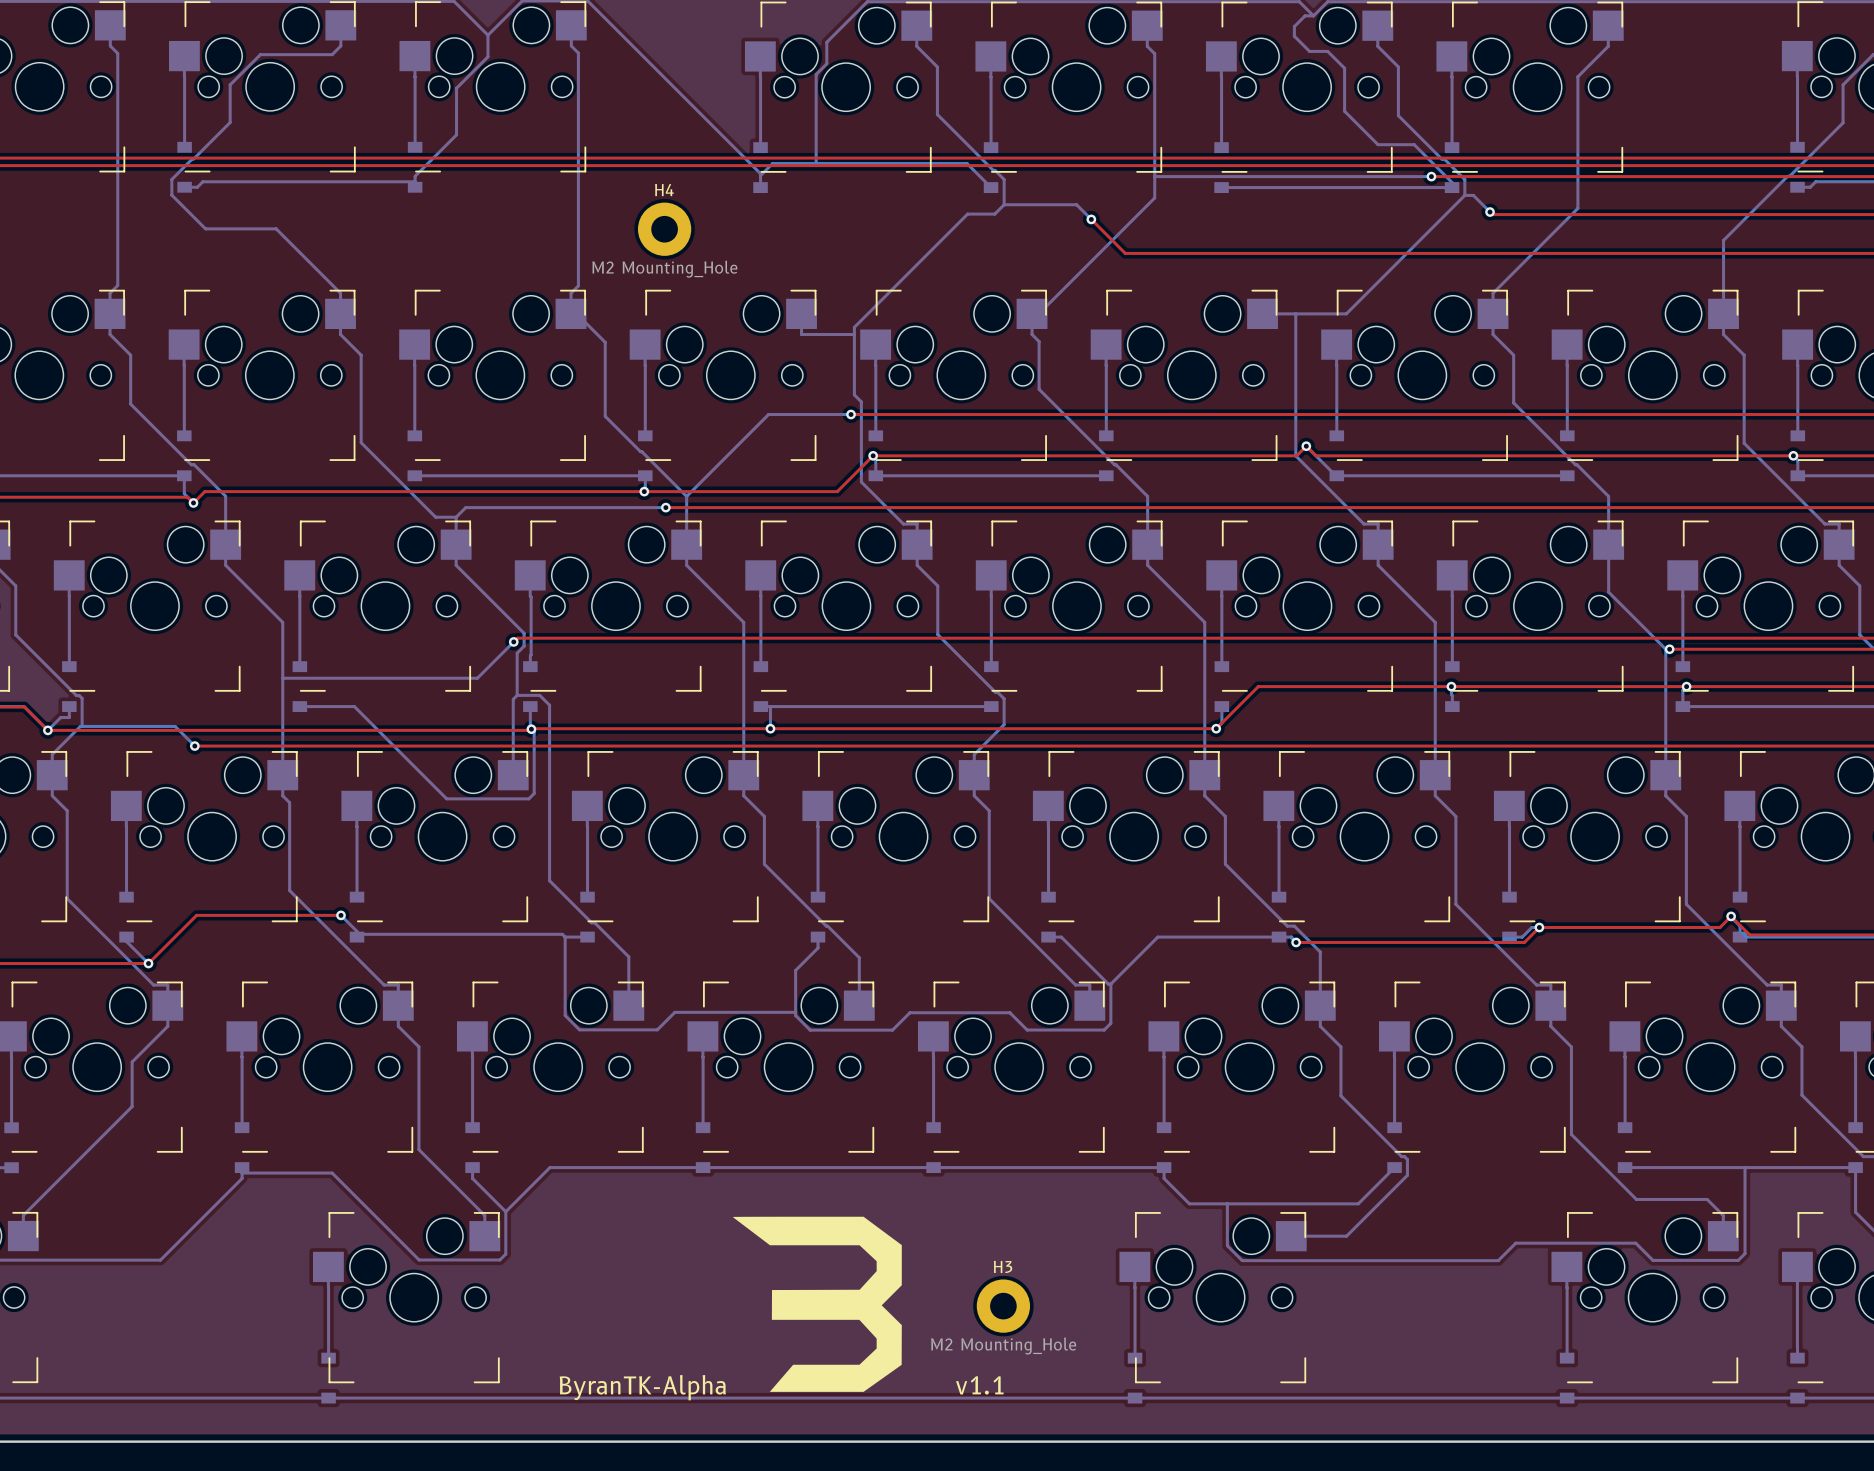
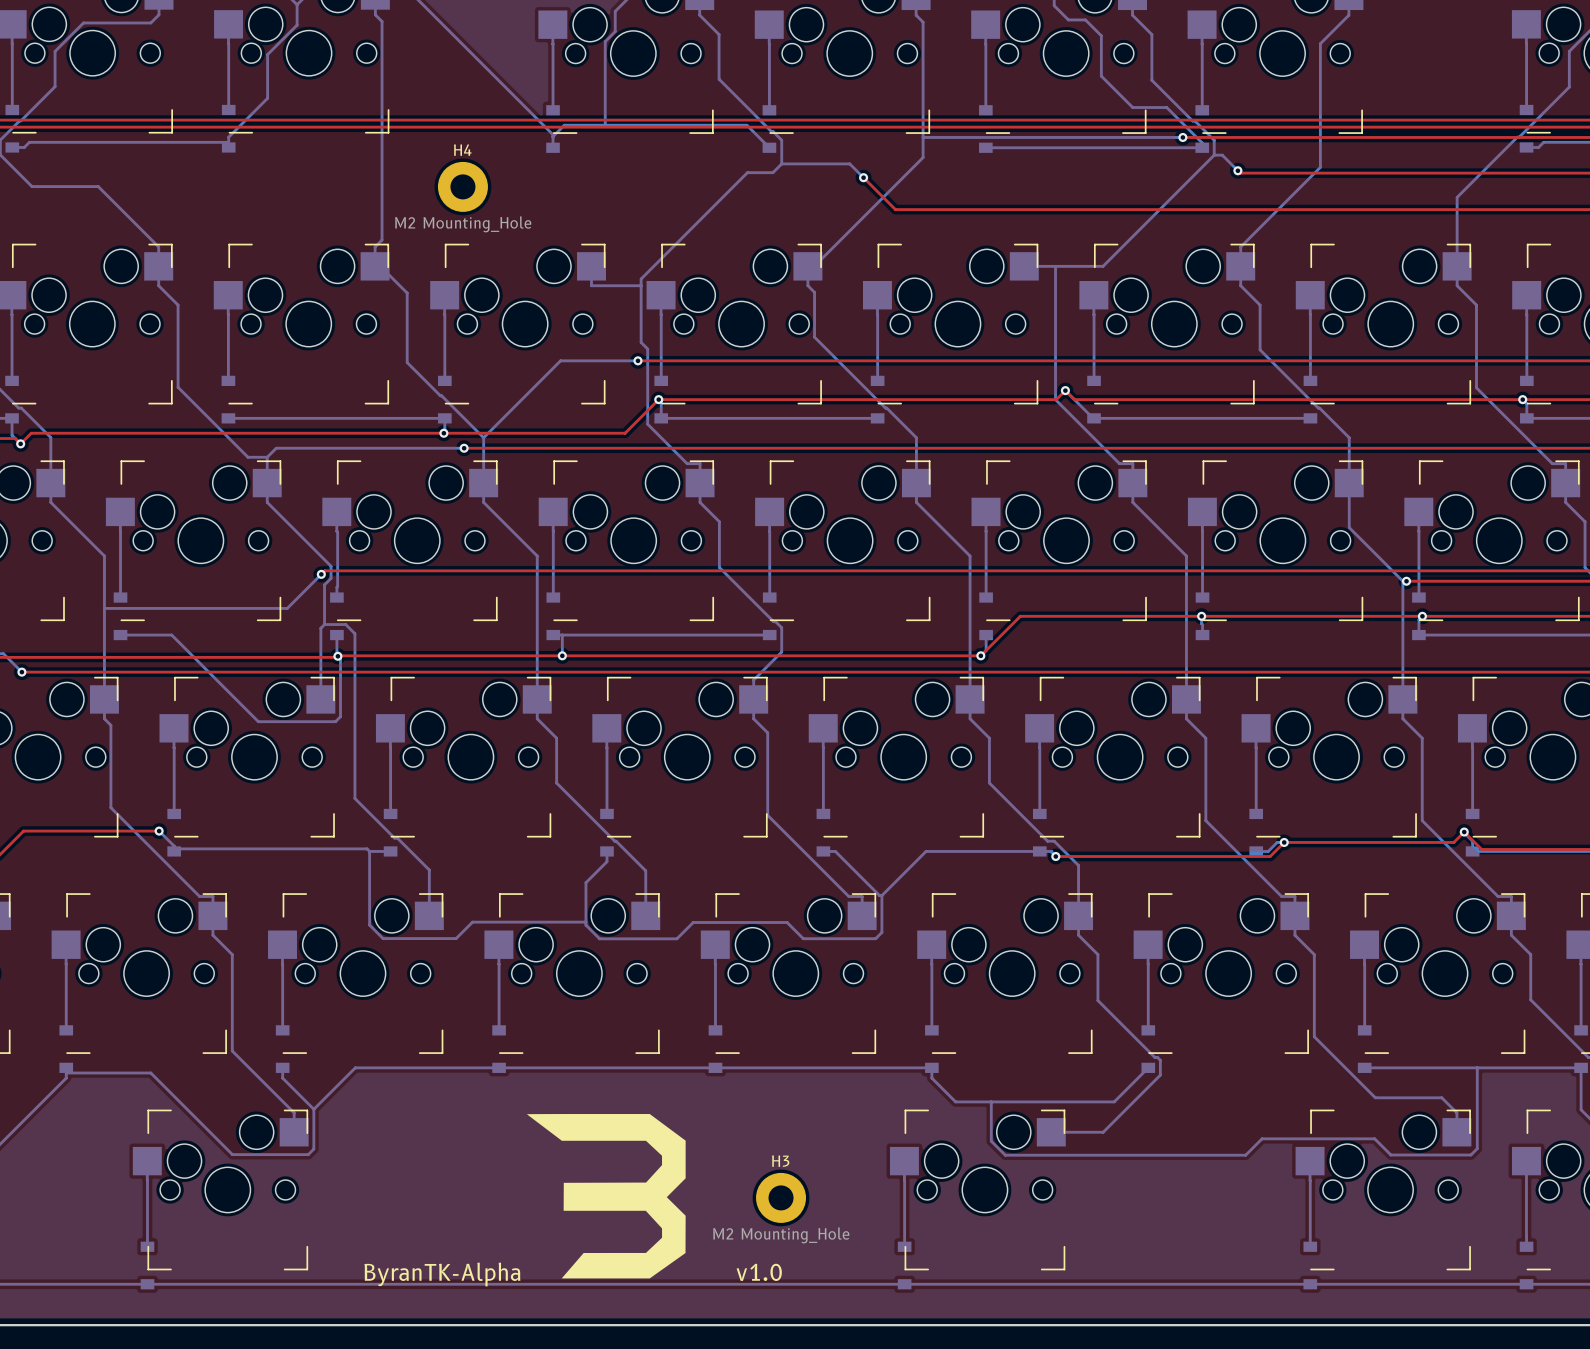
text: v1.1 (979, 1385) -> v1.0 (759, 1272)

